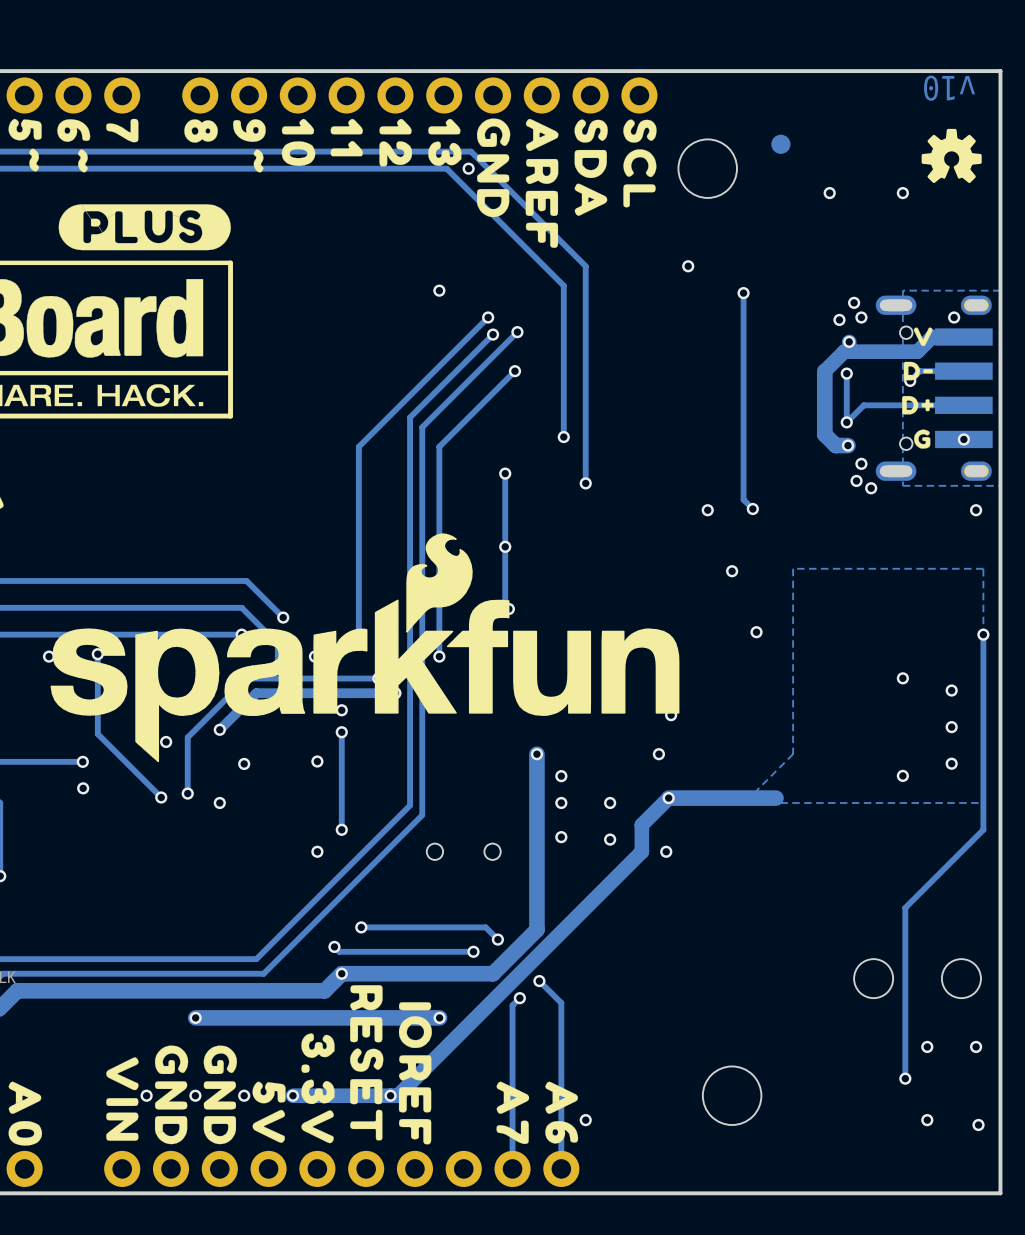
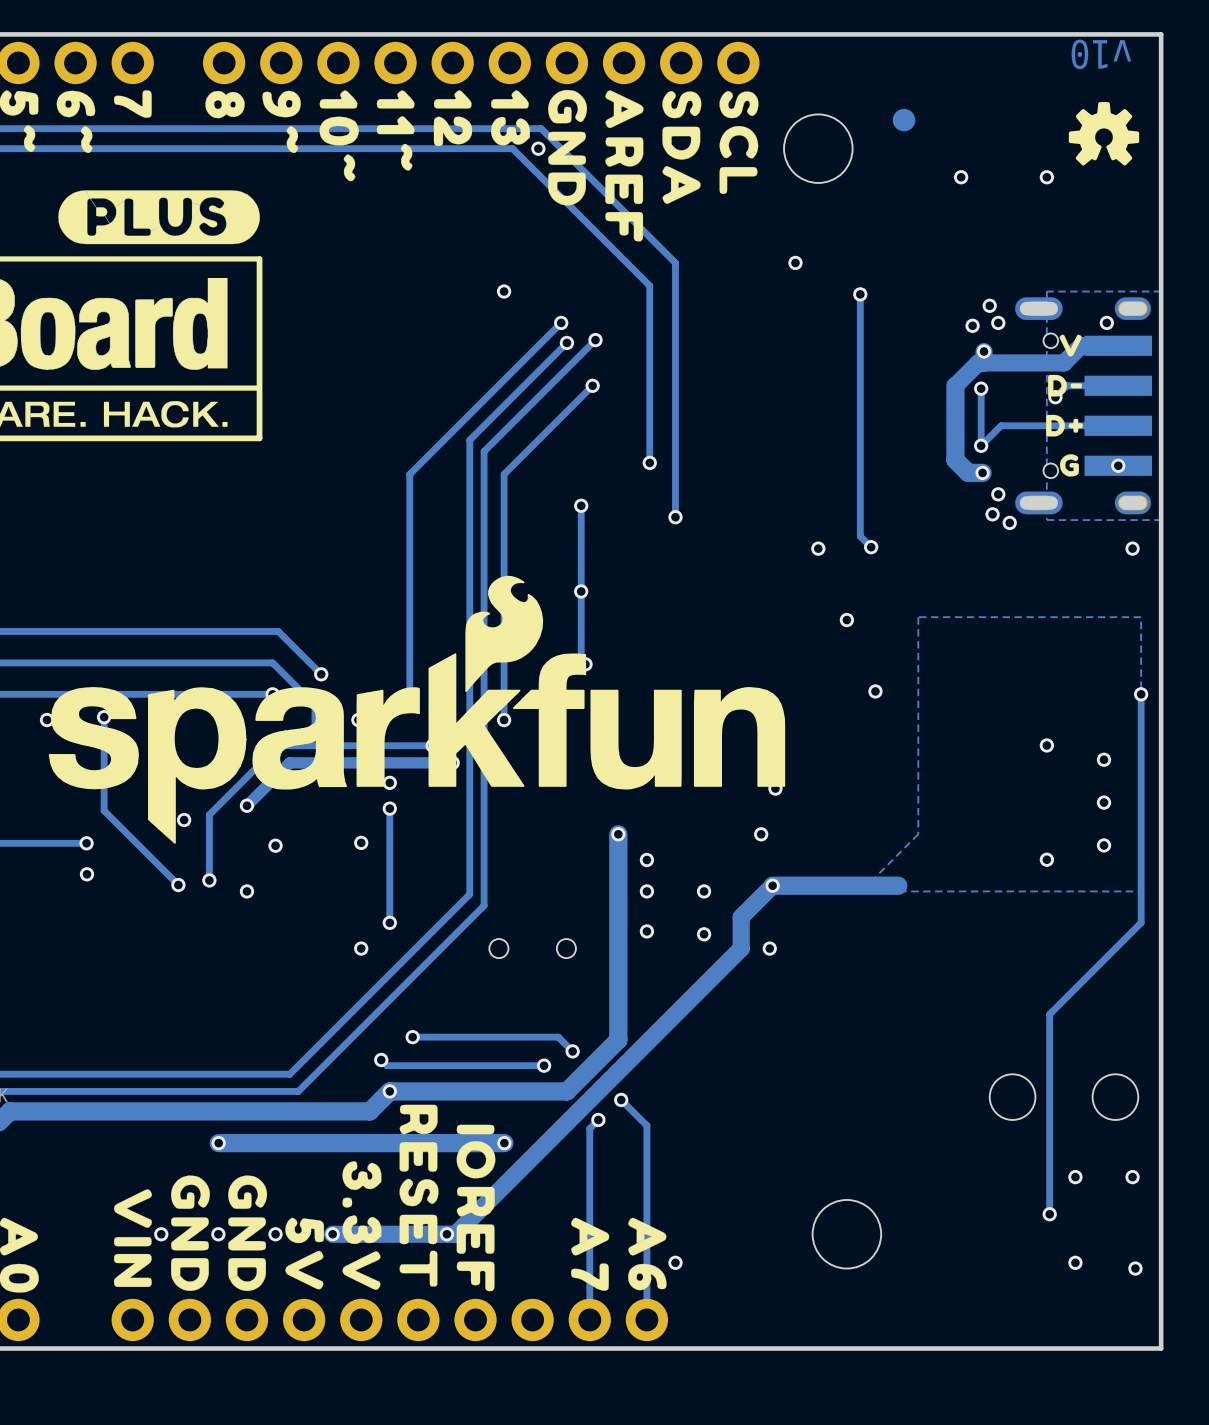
drawing shape: [281, 118, 316, 166] -> [319, 90, 359, 182]
drawing shape: [330, 118, 363, 157] -> [376, 90, 415, 171]

